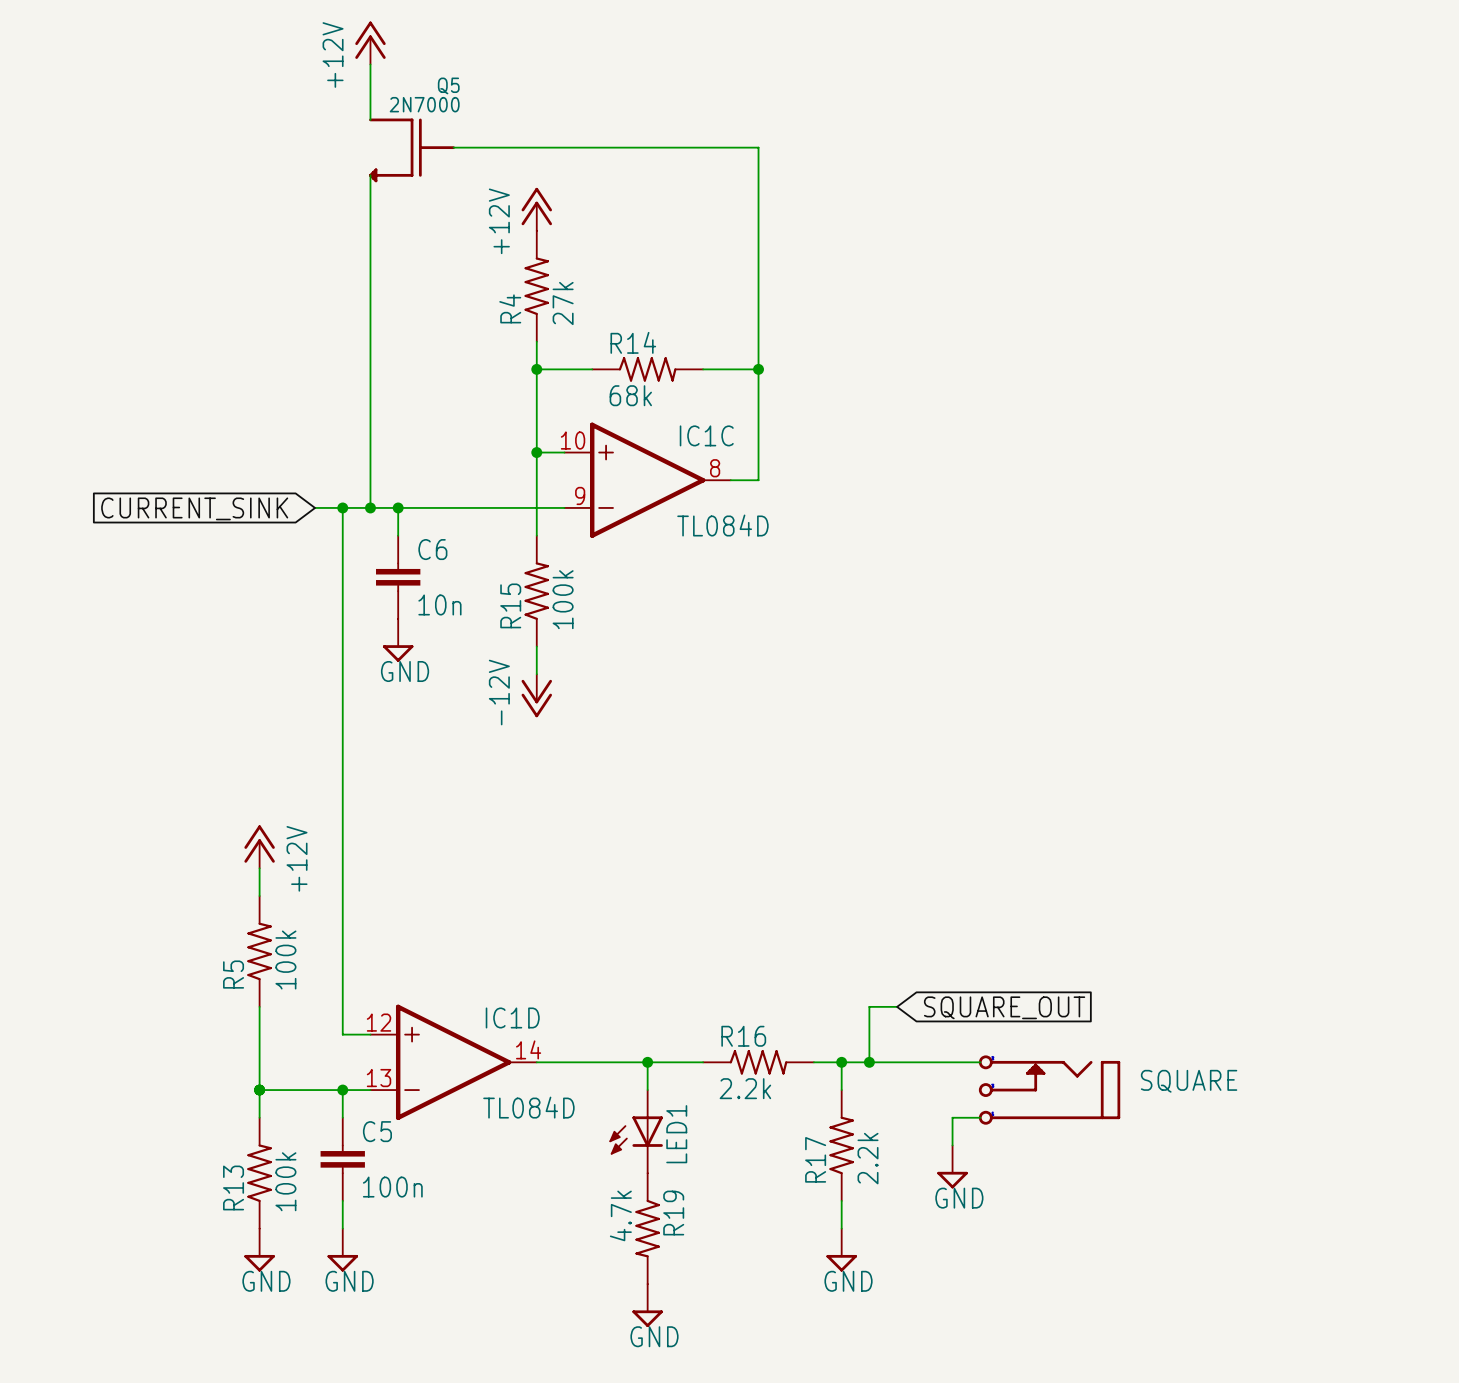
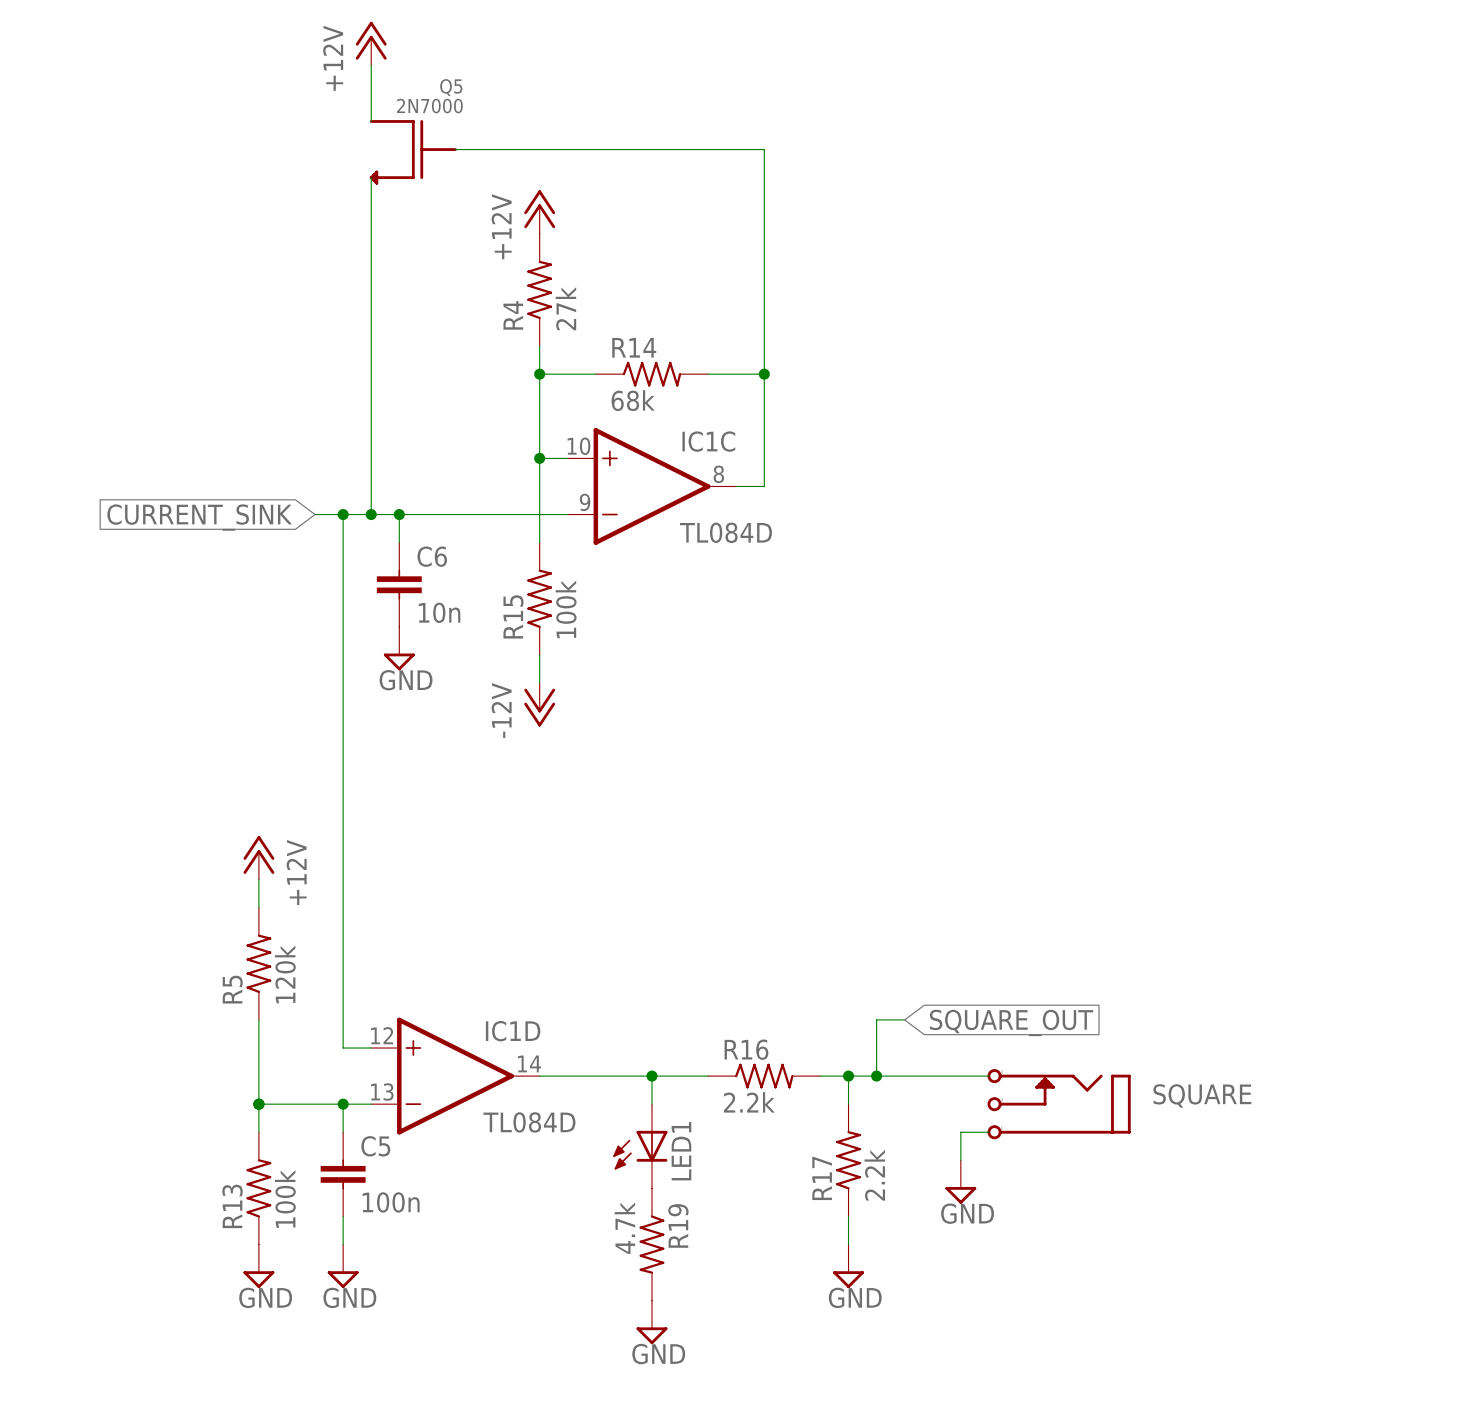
R5 value: 100k (285, 960) -> 120k (285, 974)

